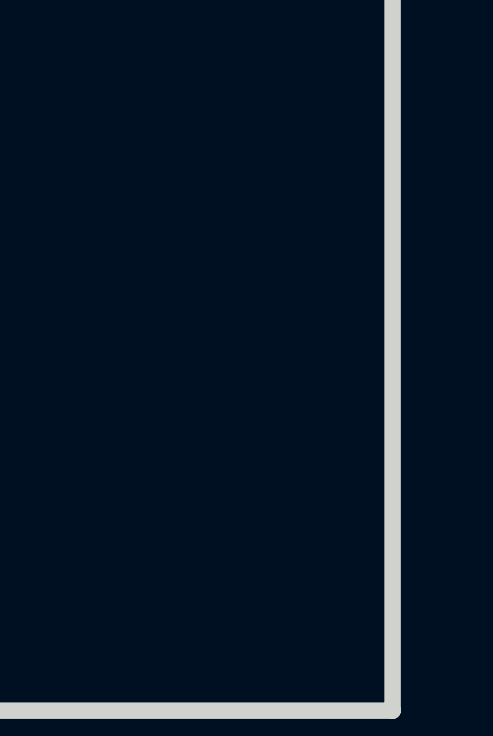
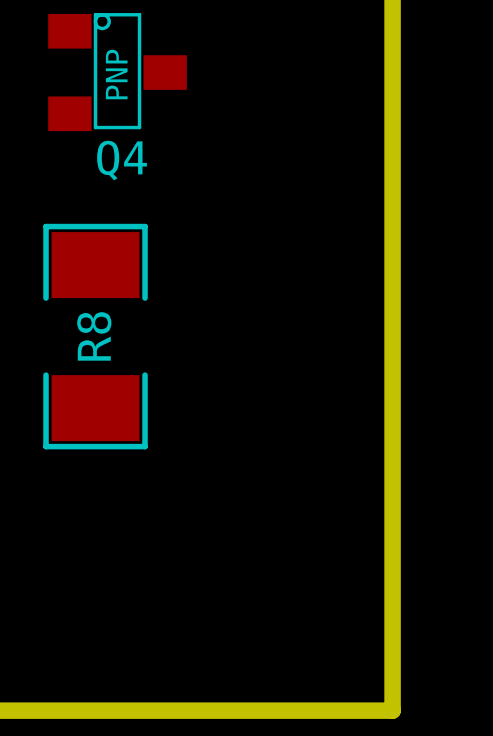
Q4: none -> PNP (117, 72)
R8: none -> (95, 336)

